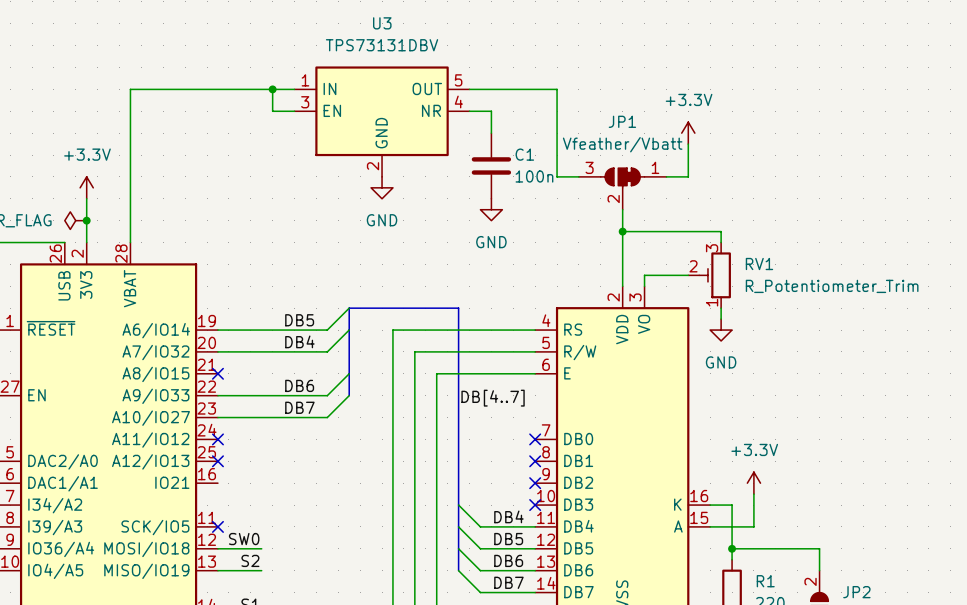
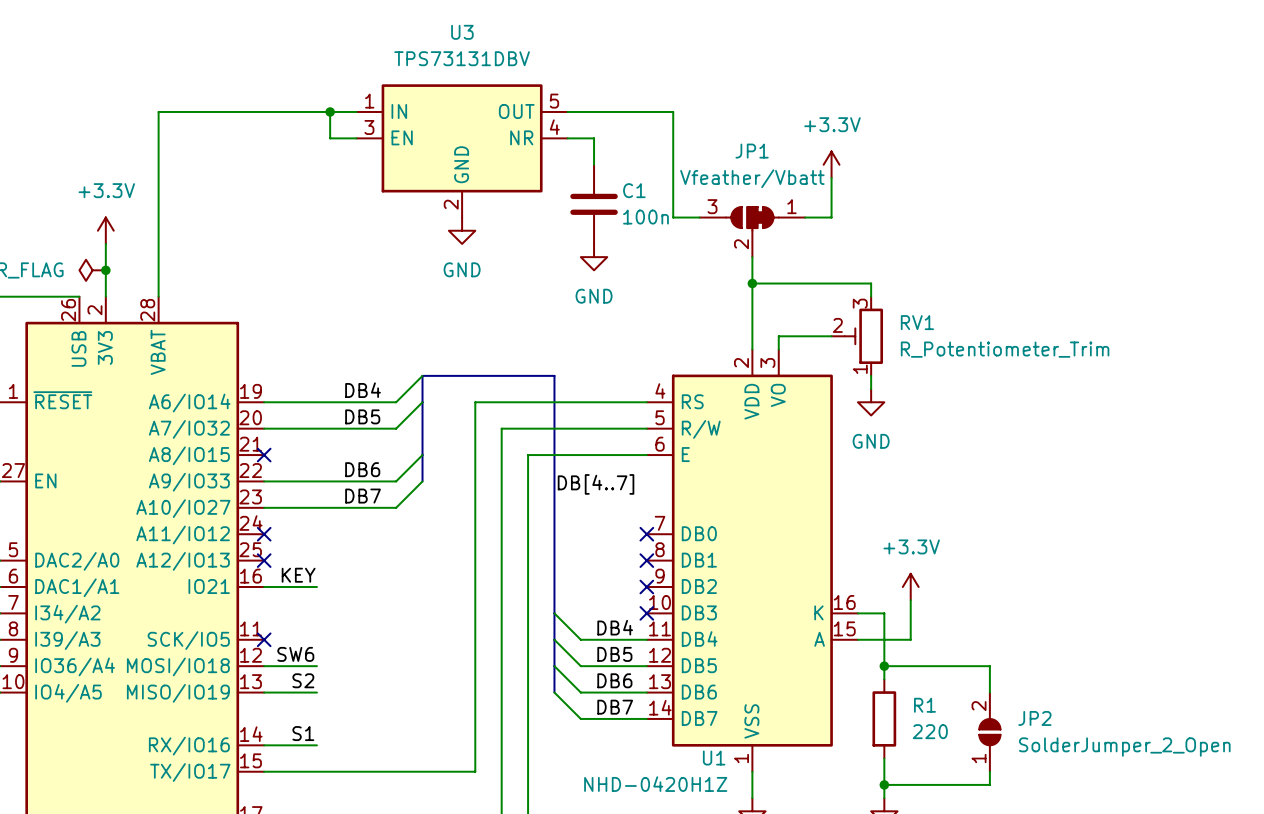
label: DB5 (299, 320) -> DB4 (363, 390)
label: DB4 (299, 341) -> DB5 (362, 416)
label: none -> KEY (298, 575)
wire: none -> (264, 587) (316, 587)
label: SW0 (244, 539) -> SW6 (295, 654)

